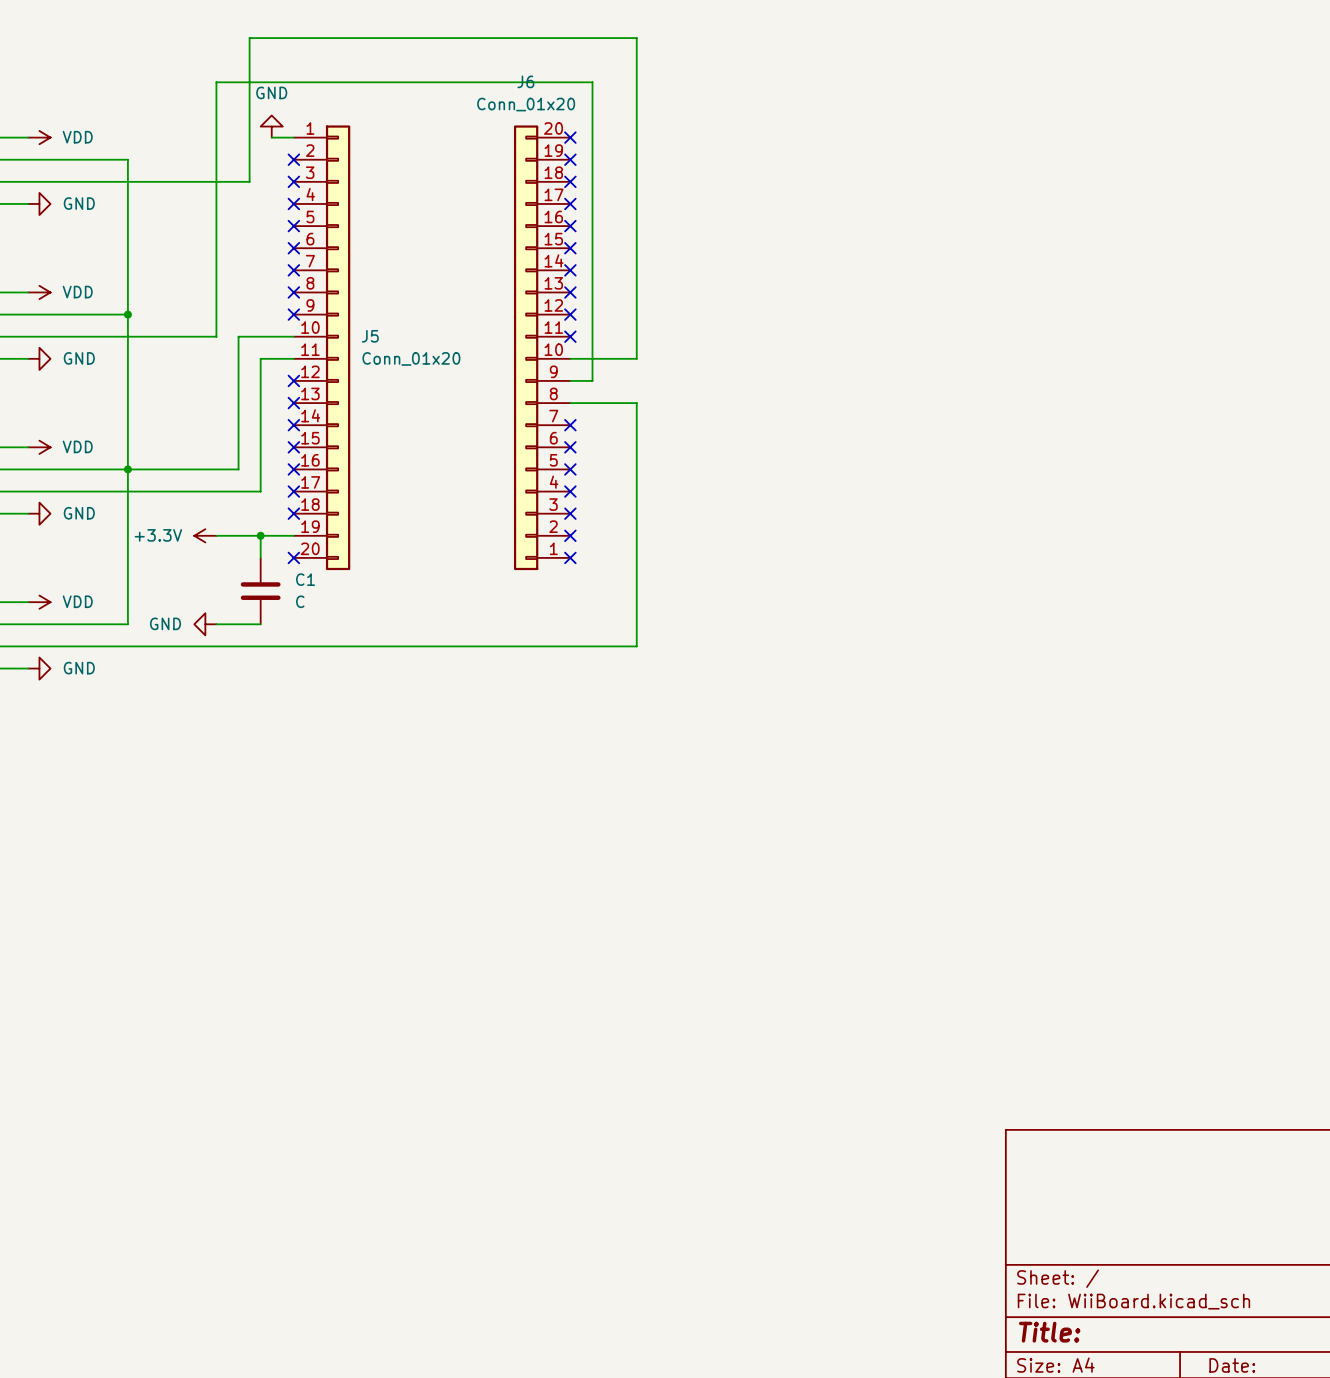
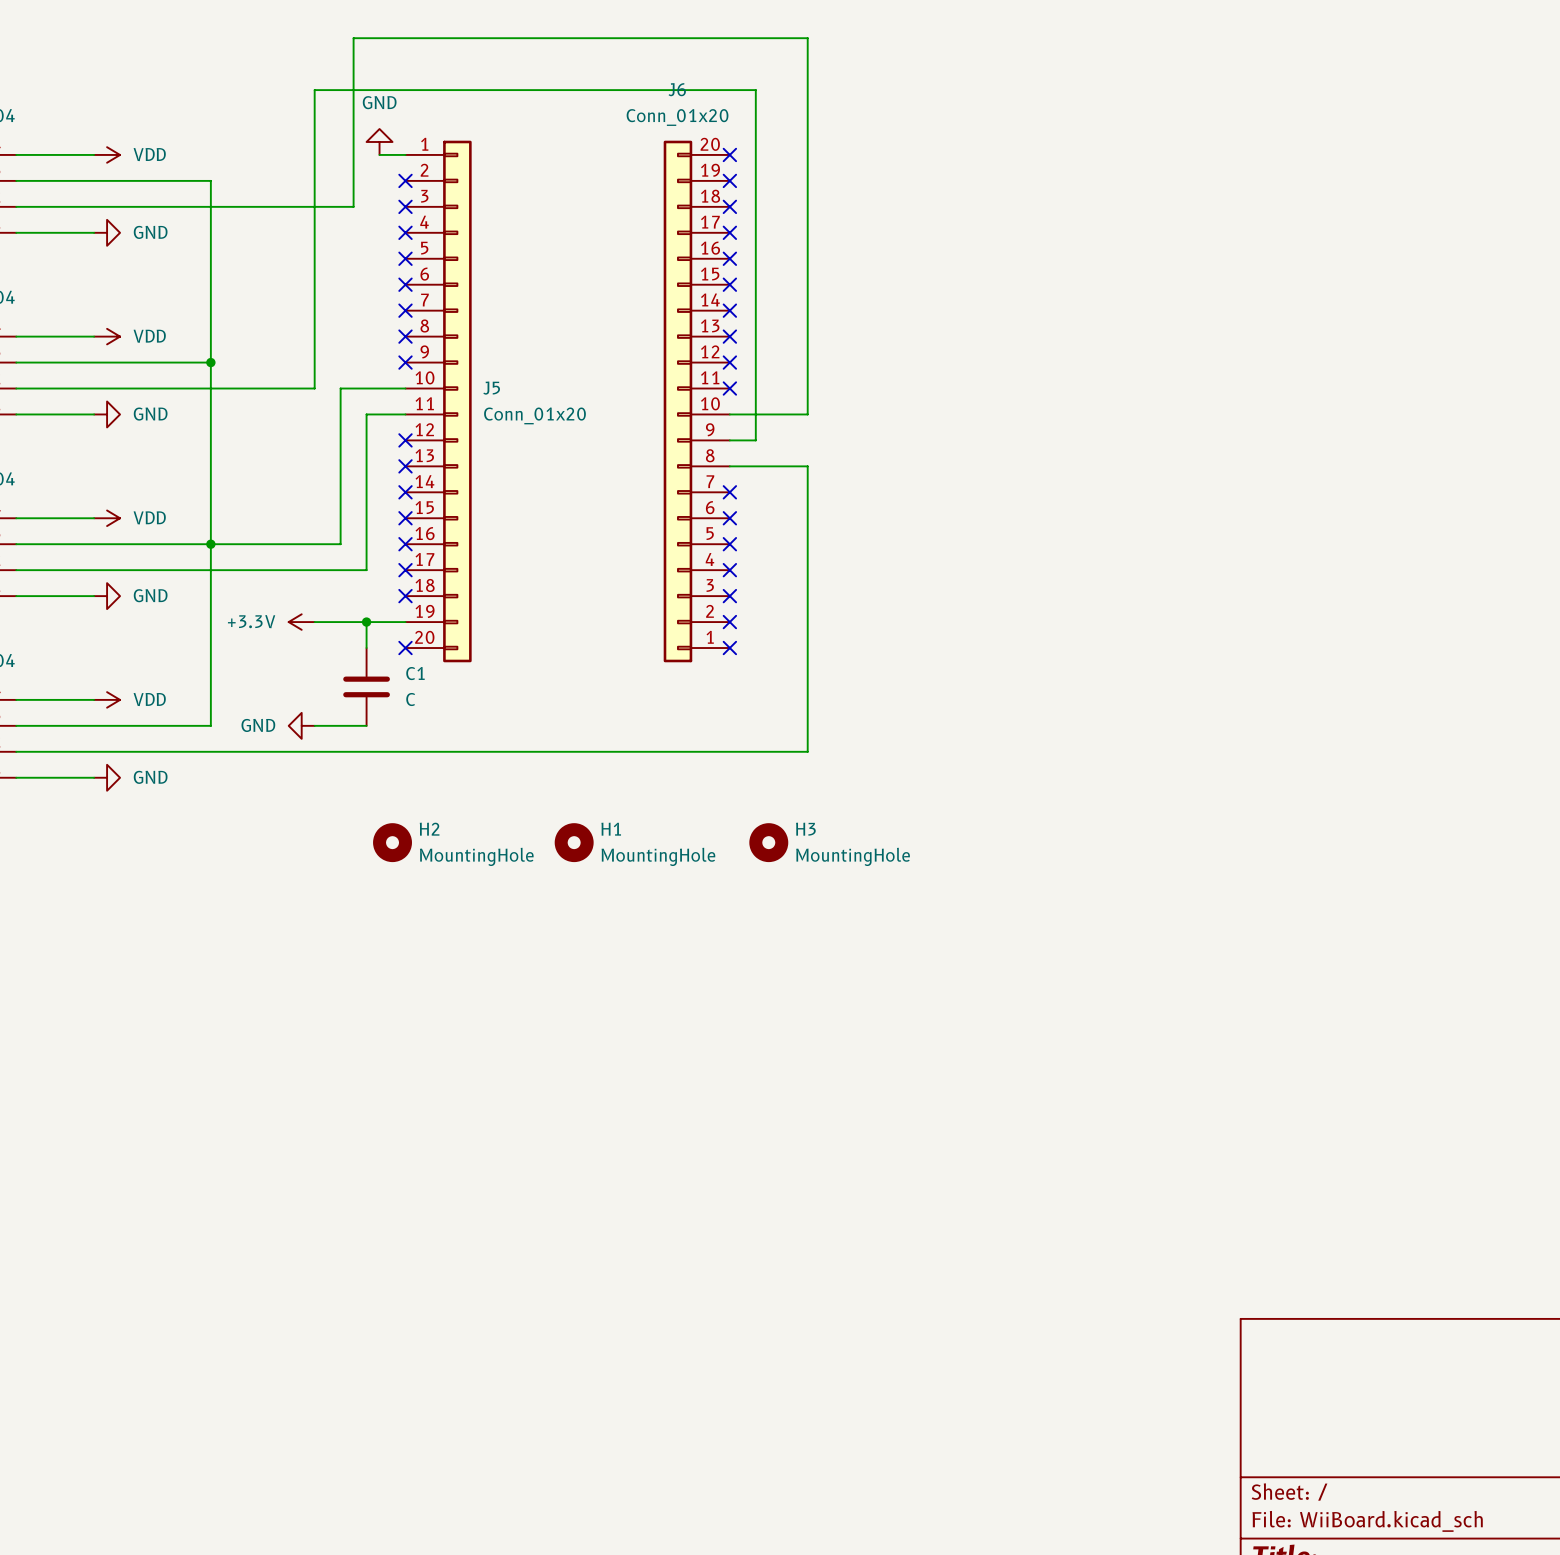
H2: none -> MountingHole (392, 842)
H1: none -> MountingHole (574, 842)
H3: none -> MountingHole (768, 842)

